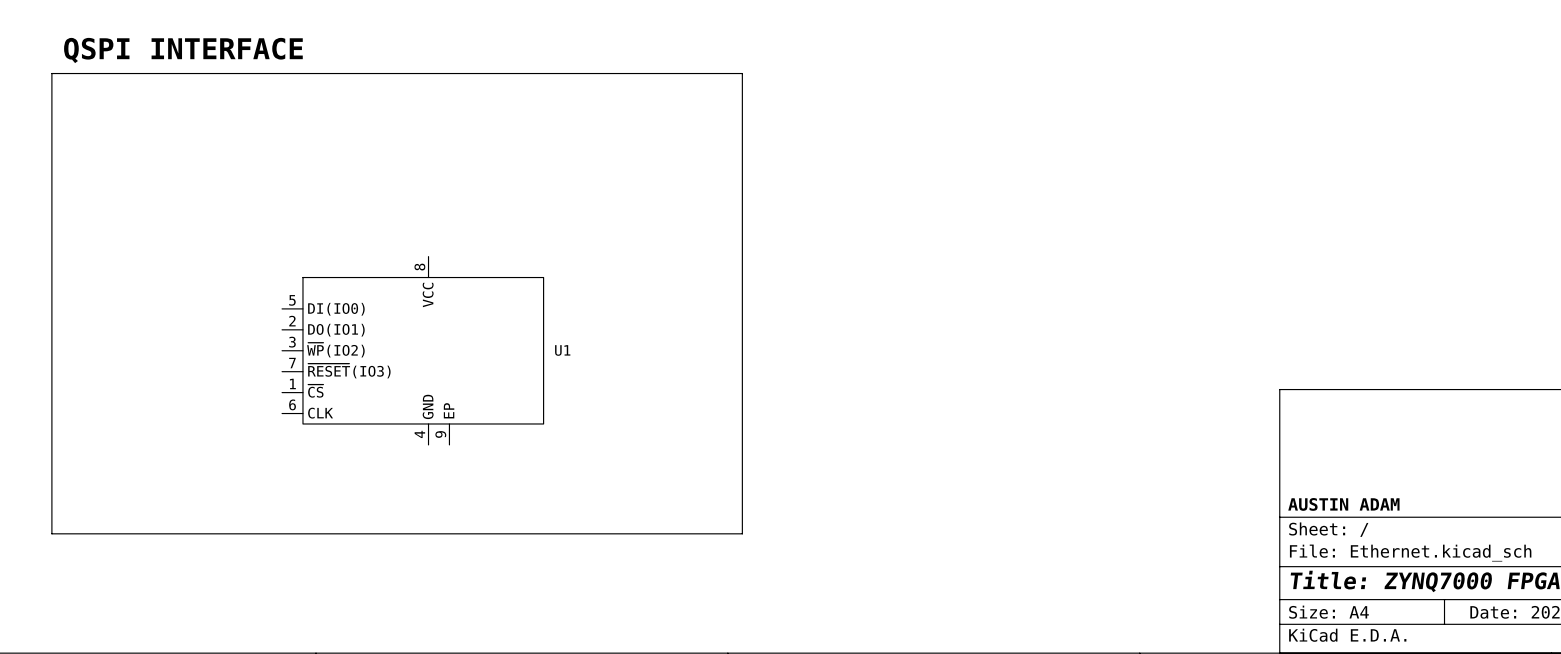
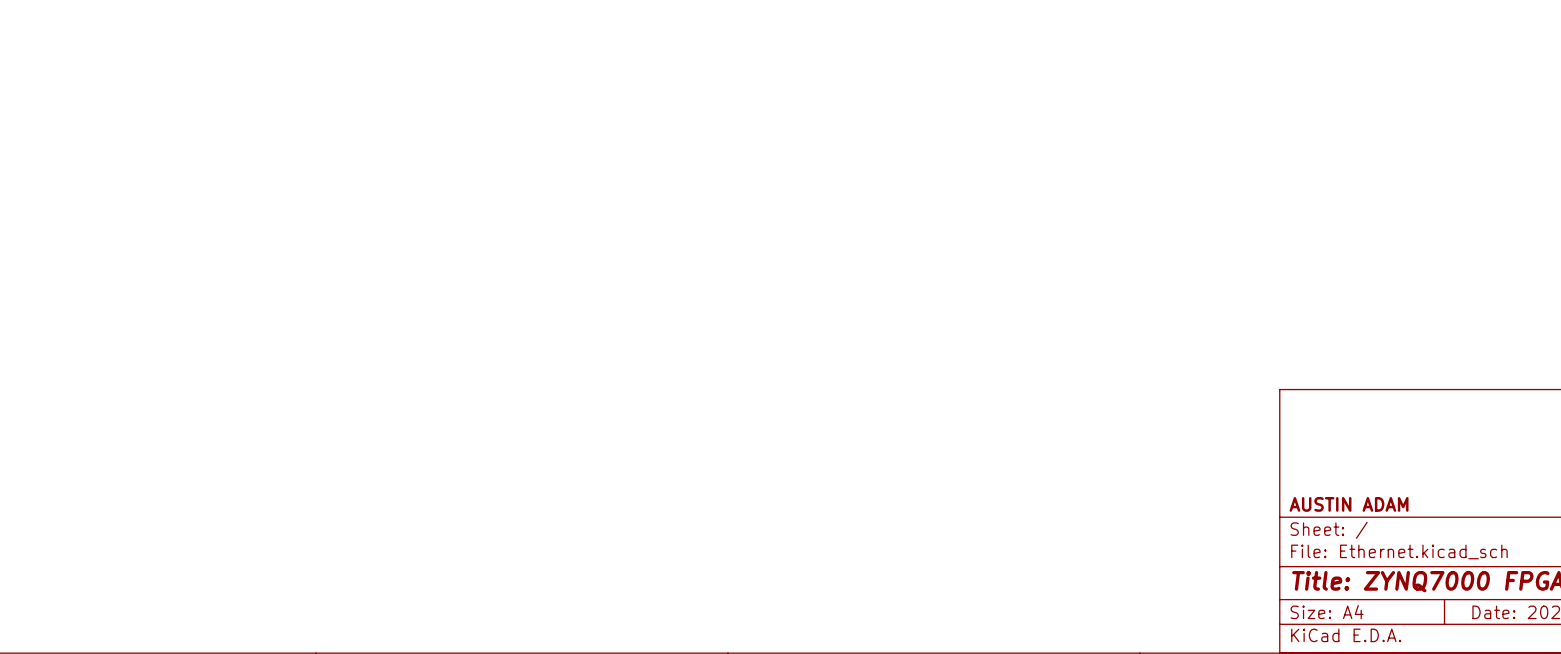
text: QSPI INTERFACE (183, 50) -> none
line: (51, 73) (742, 73) (742, 533) (51, 533) (51, 73) -> none
U1: (412, 350) -> none

